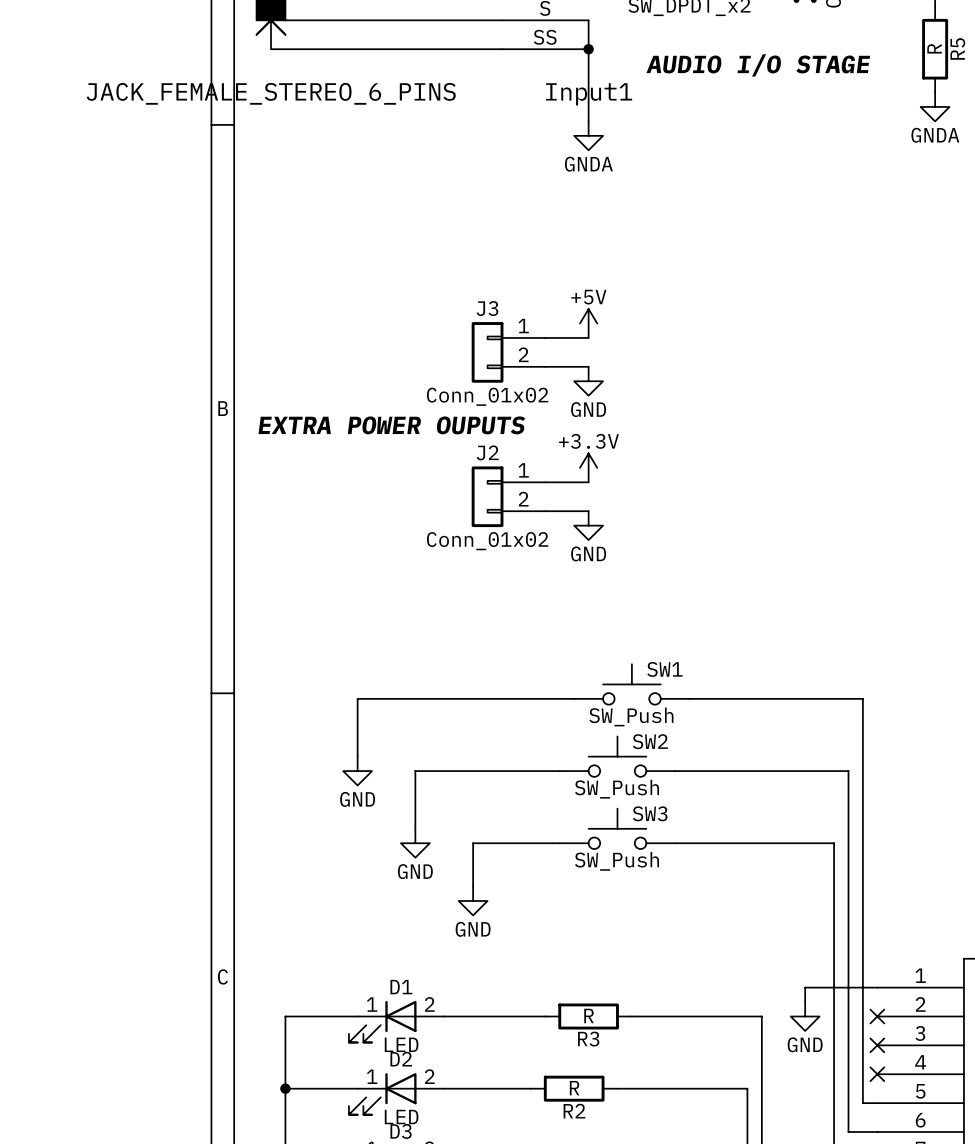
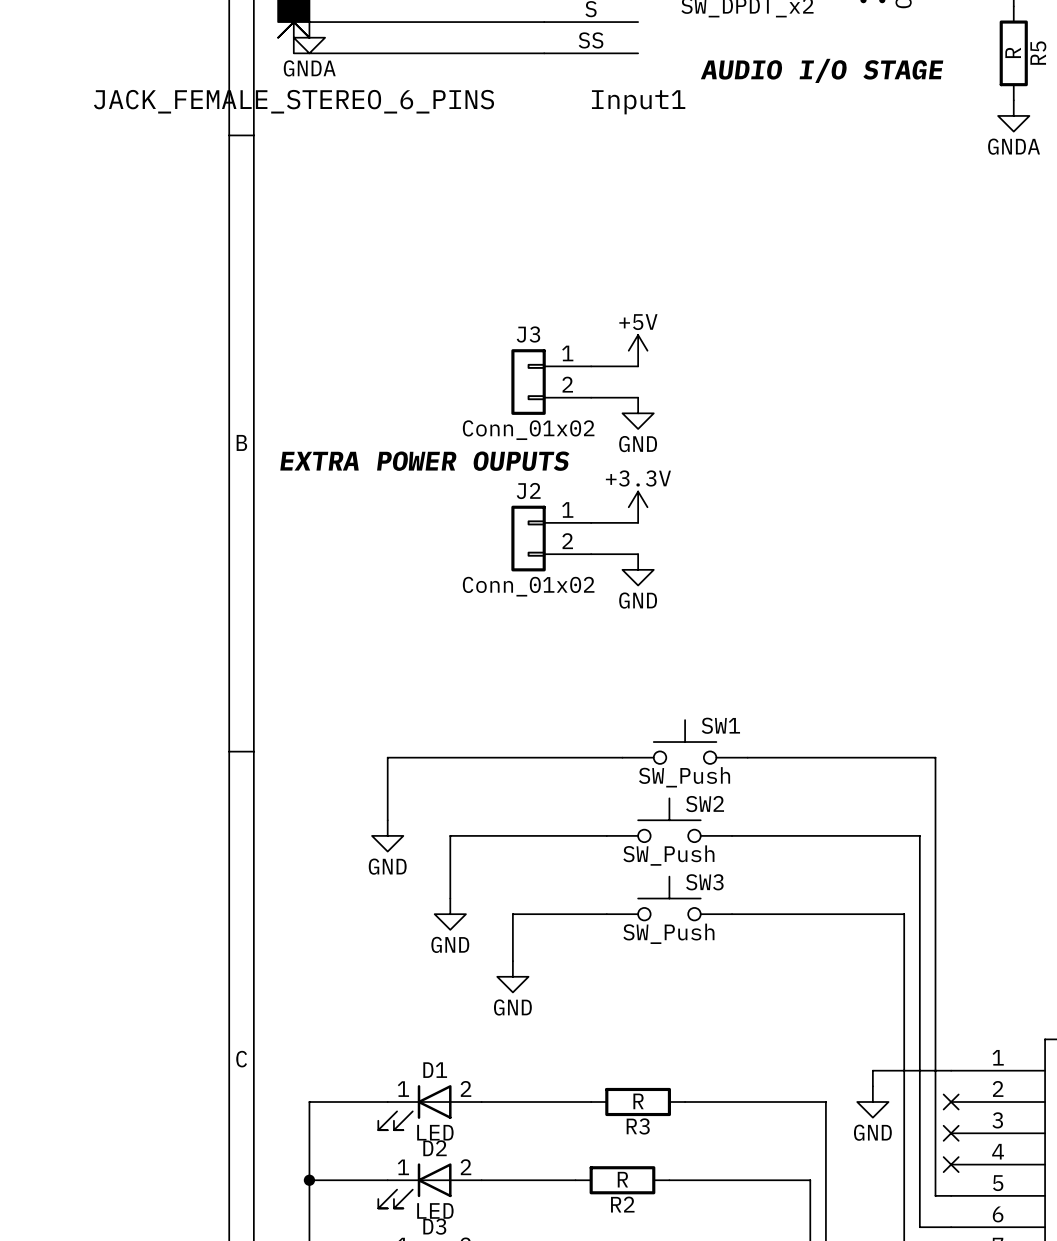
wire: (588, 20) (588, 121) -> none
power symbol: none -> GNDA (309, 37)
junction: (588, 49) -> none
power symbol: GNDA (588, 135) -> none

